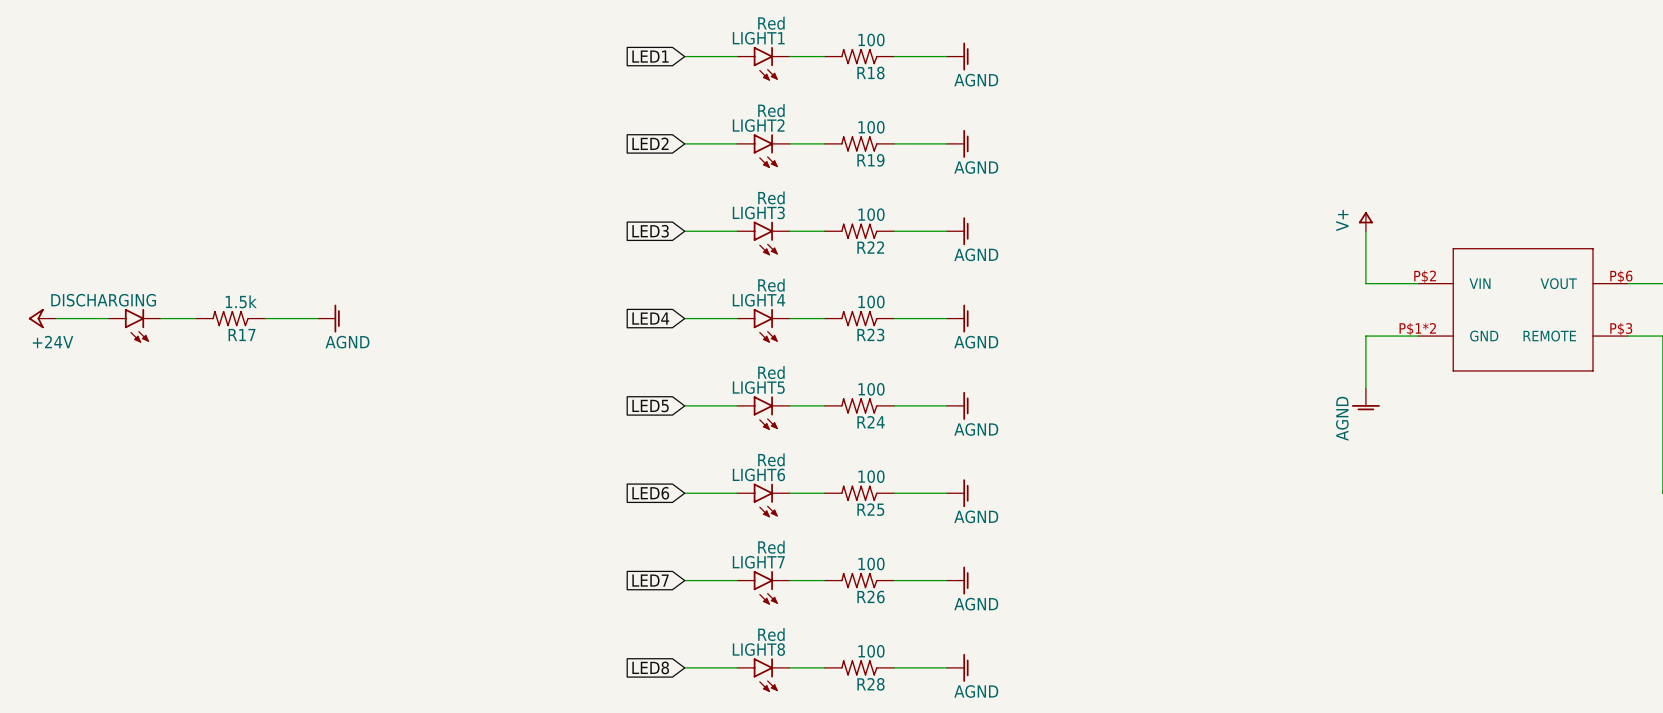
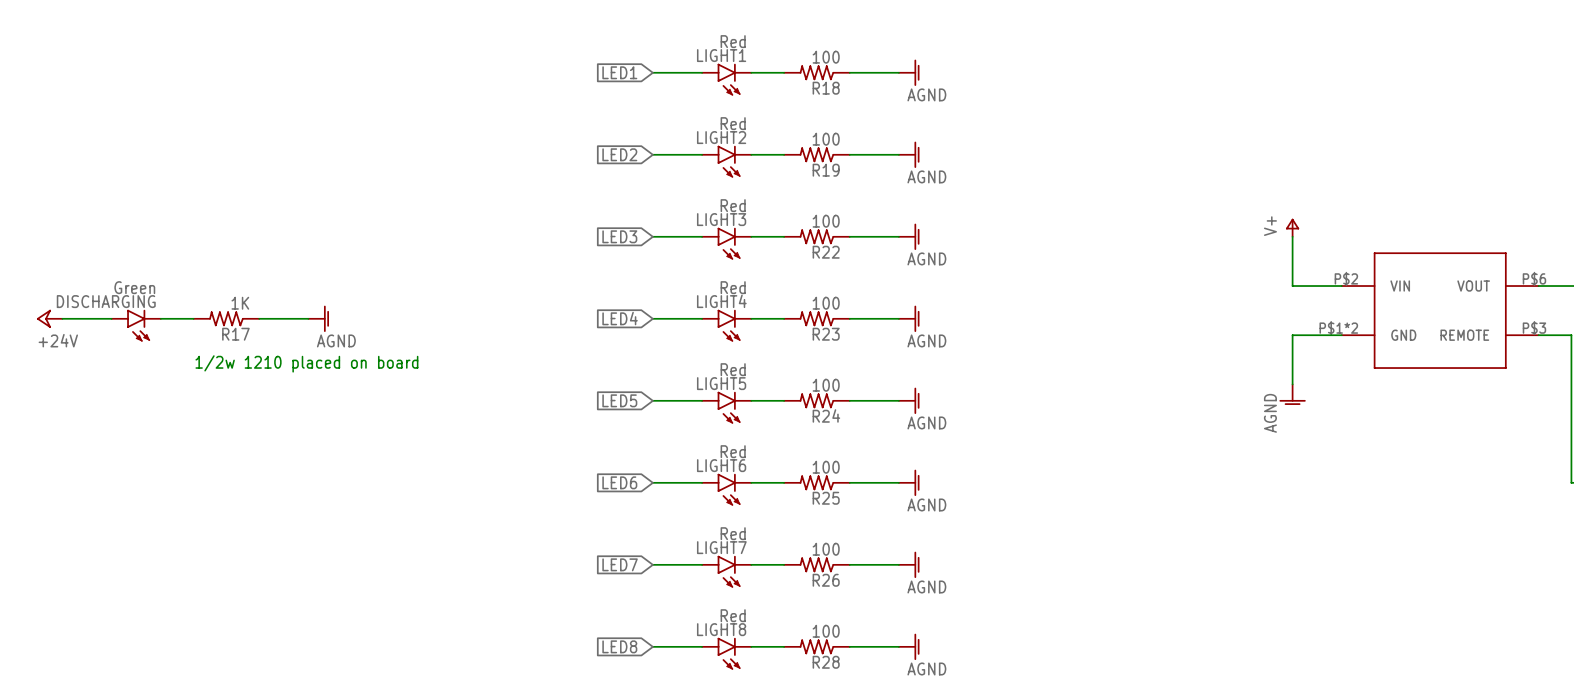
DISCHARGING value: none -> Green (134, 287)
R17 value: 1.5k (241, 301) -> 1K (240, 303)
text: none -> 1/2w 1210 placed on board (306, 363)

